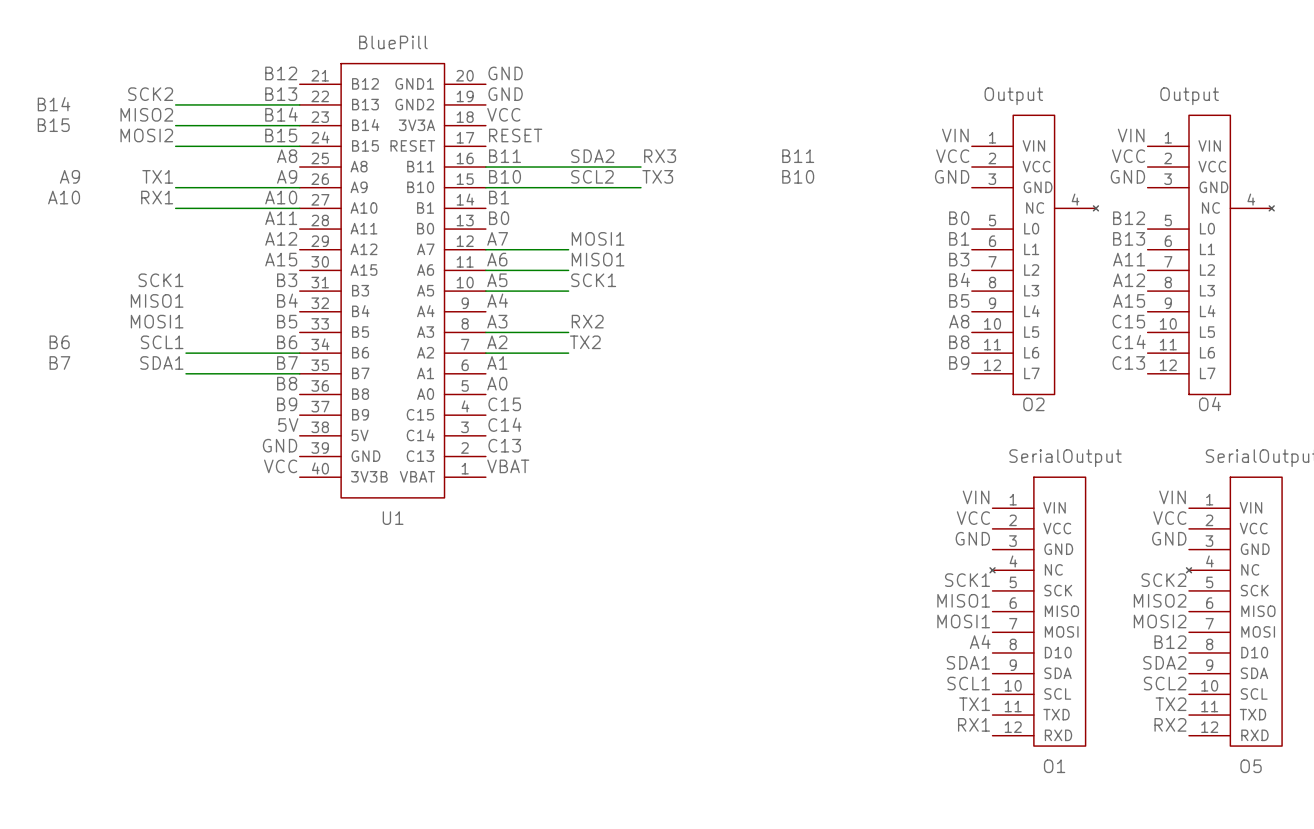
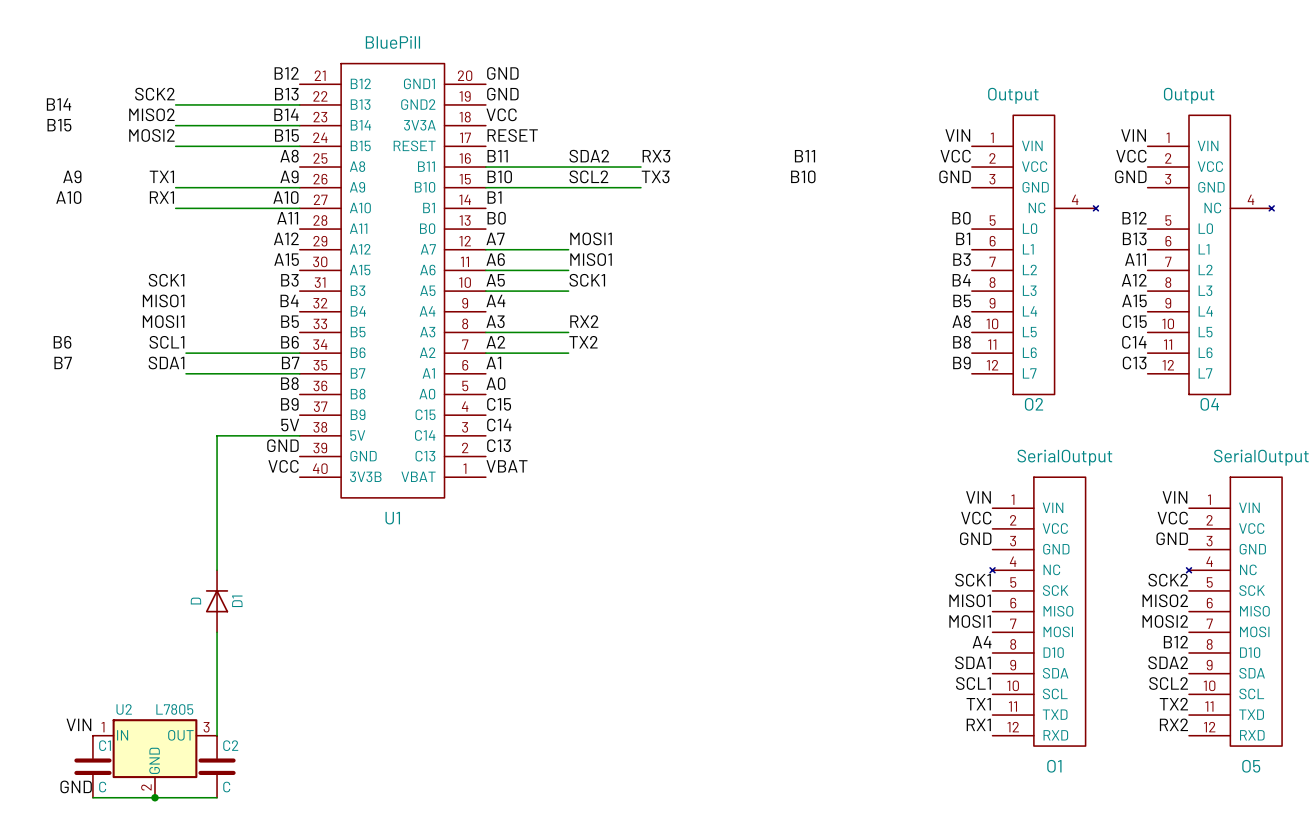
wire: none -> (299, 435) (217, 435) (217, 570)
D1: none -> D (217, 601)
wire: none -> (217, 632) (217, 735)
label: none -> VIN (78, 724)
U2: none -> L7805 (154, 758)
C1: none -> C (92, 766)
C2: none -> C (217, 766)
label: none -> GND (76, 786)
wire: none -> (92, 797) (217, 797)
junction: none -> (154, 797)

